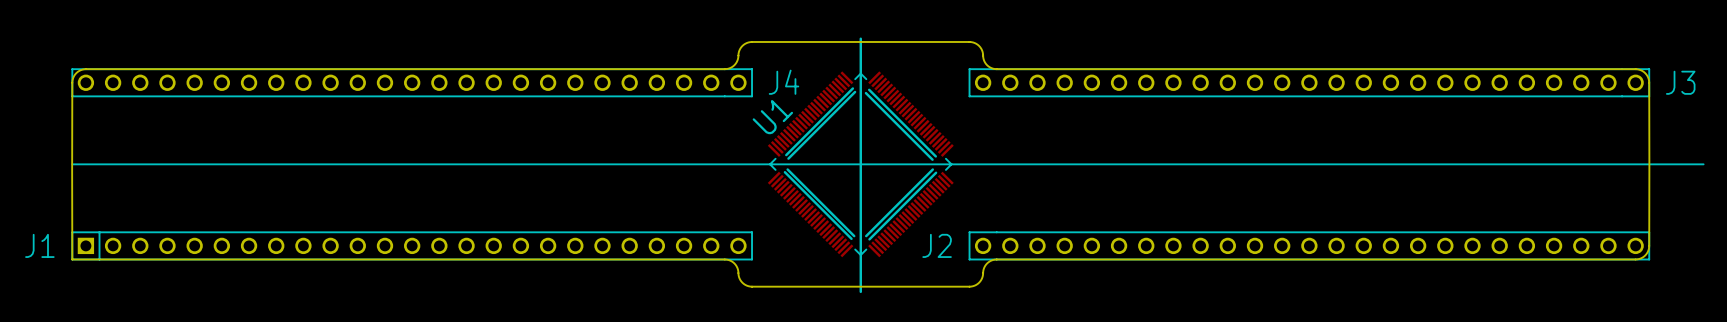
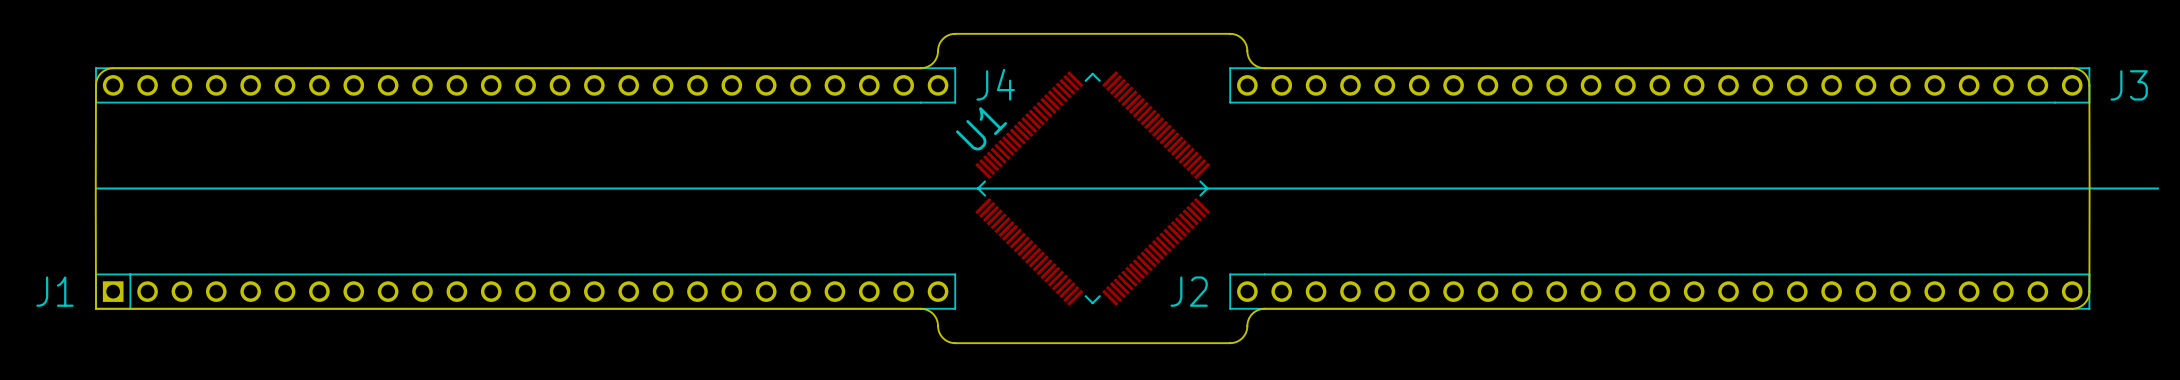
line: (860, 38) (860, 291) -> none
line: (852, 88) (786, 155) -> none
line: (869, 89) (935, 156) -> none
line: (855, 92) (788, 158) -> none
line: (865, 93) (932, 159) -> none
line: (787, 169) (854, 236) -> none
line: (932, 169) (866, 236) -> none
line: (784, 172) (851, 238) -> none
line: (936, 172) (869, 239) -> none

